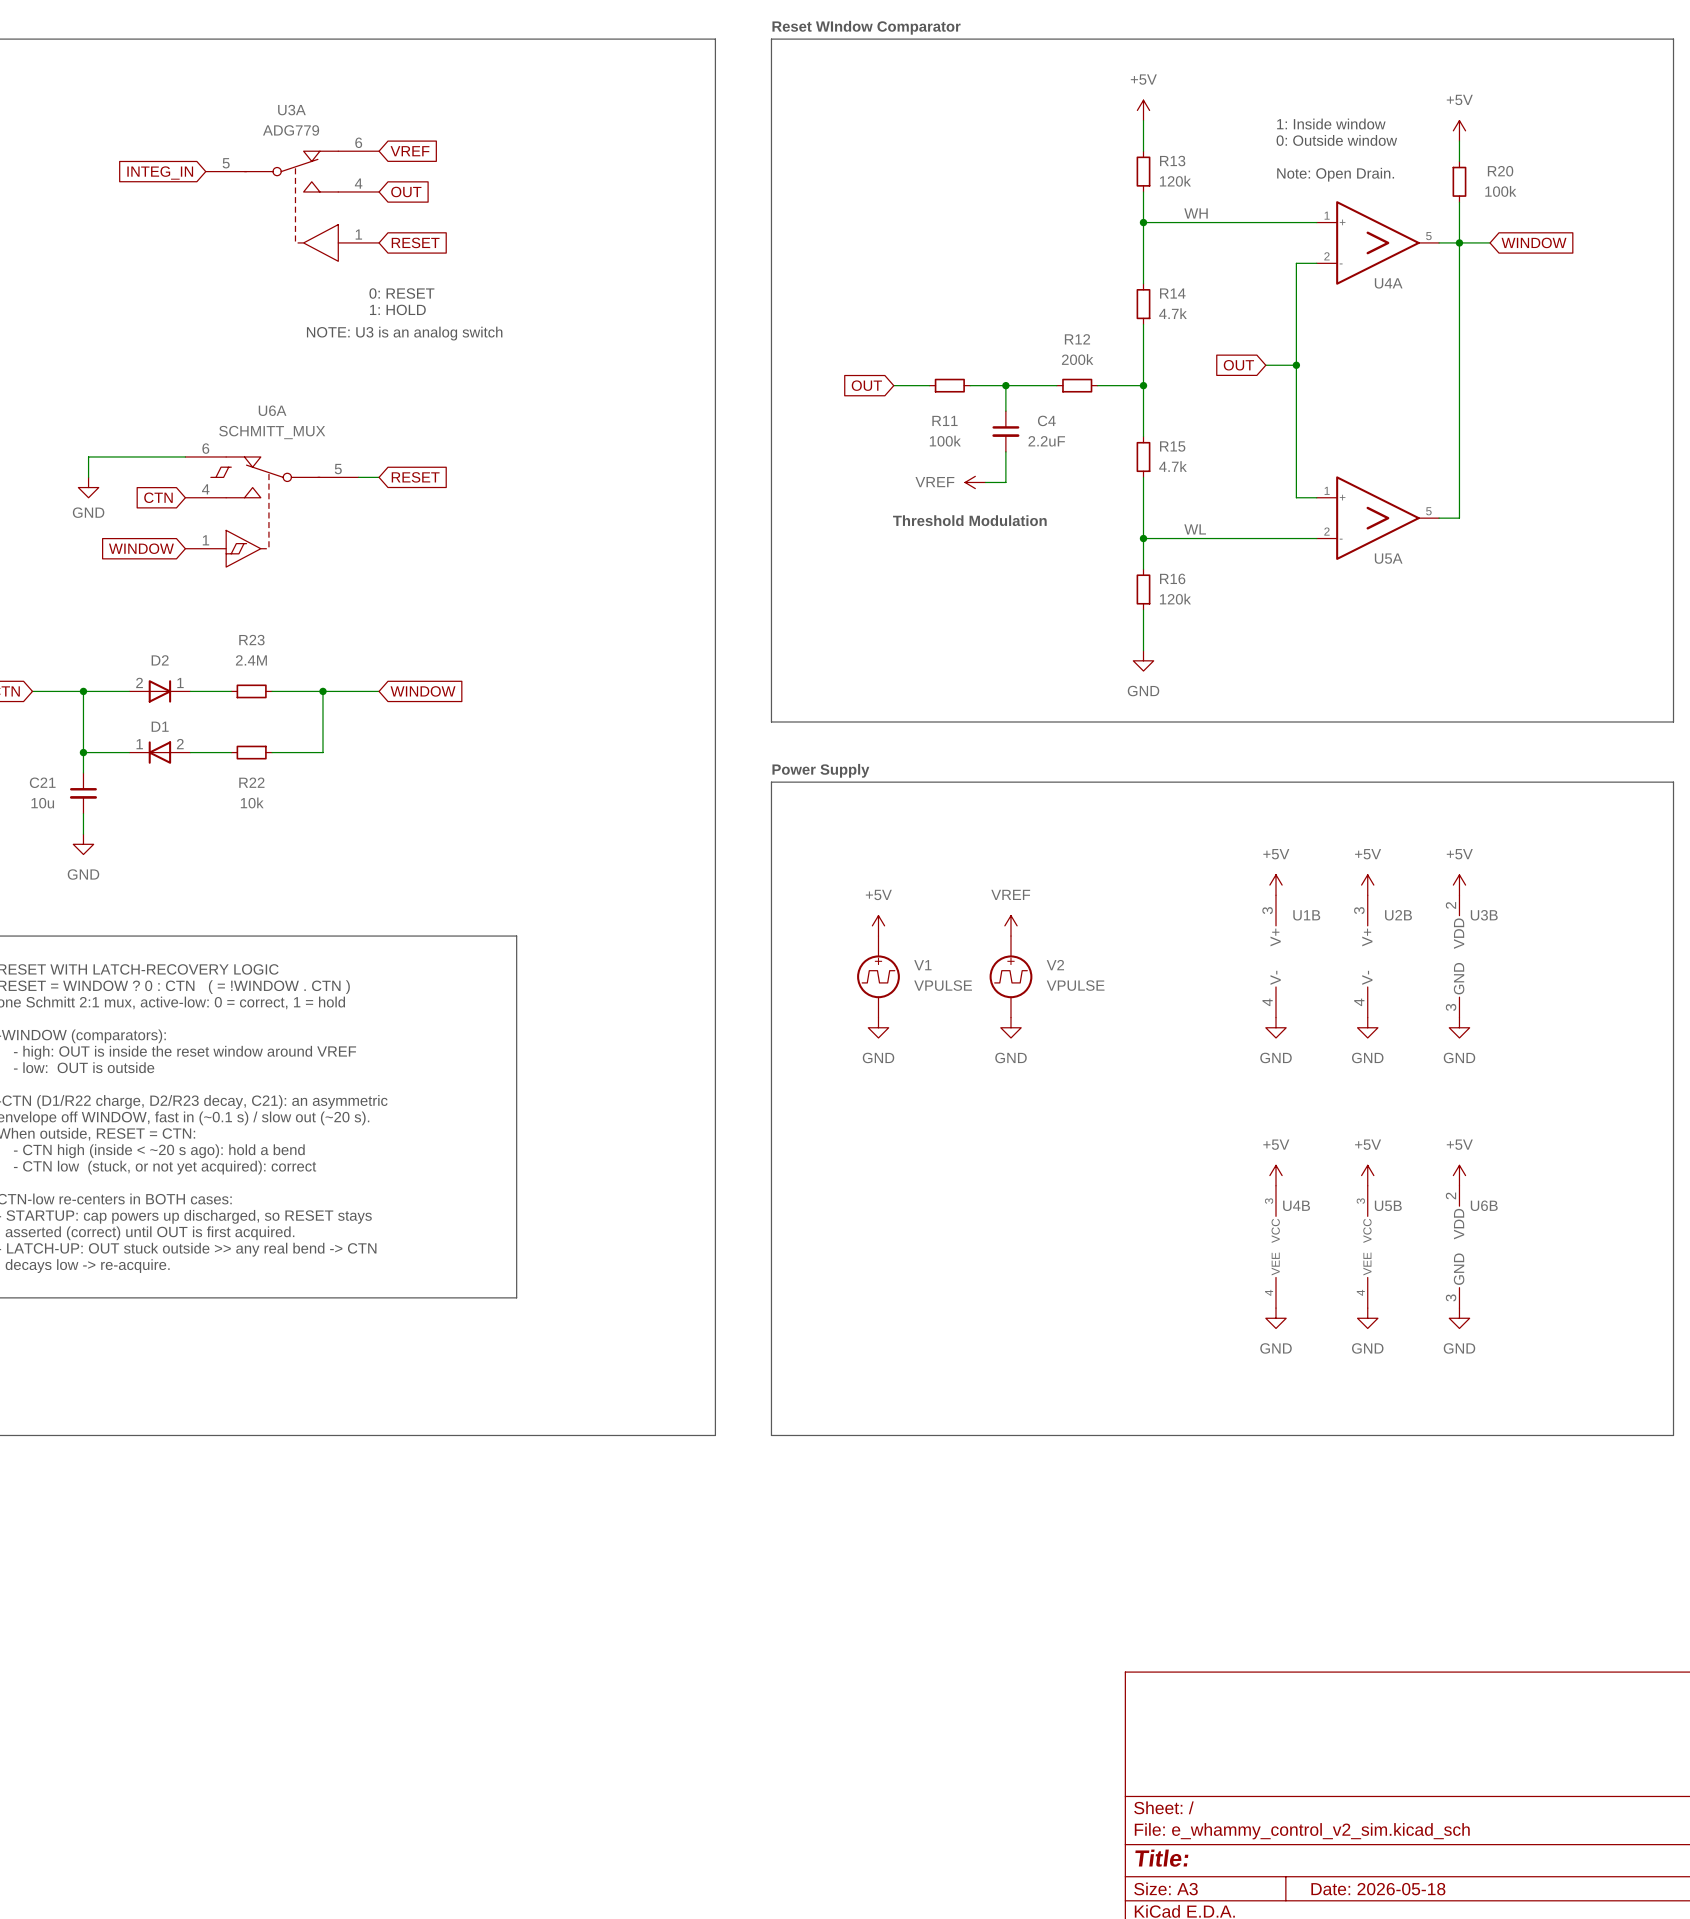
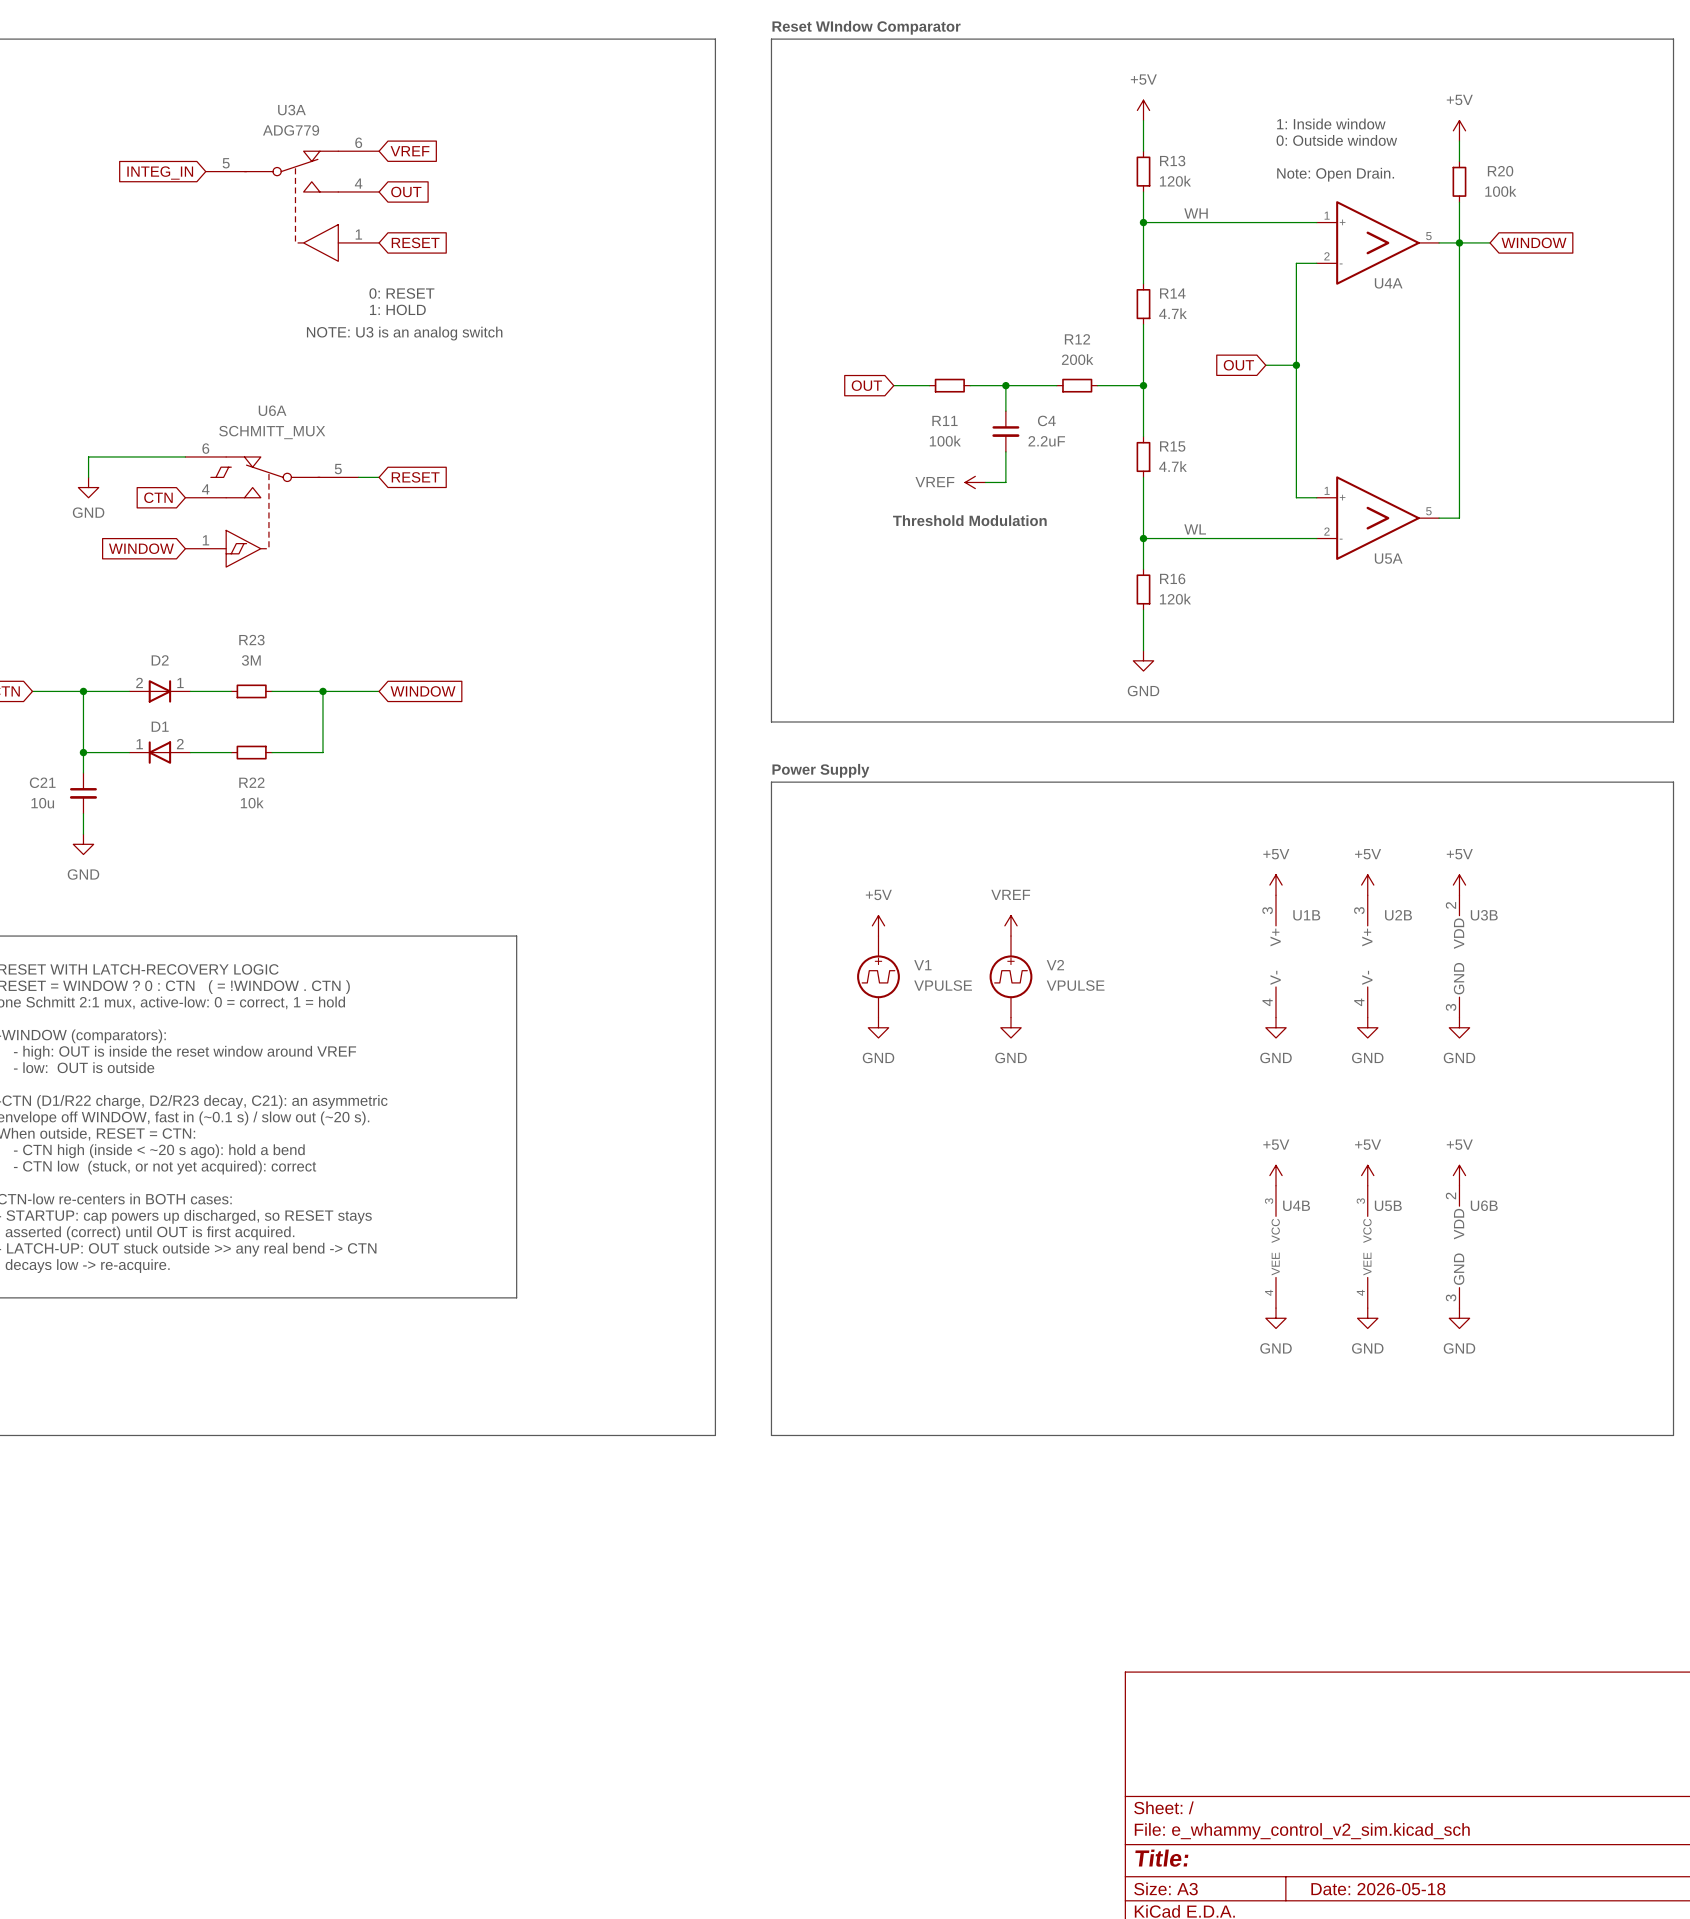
R23 value: 2.4M (251, 660) -> 3M (251, 660)

